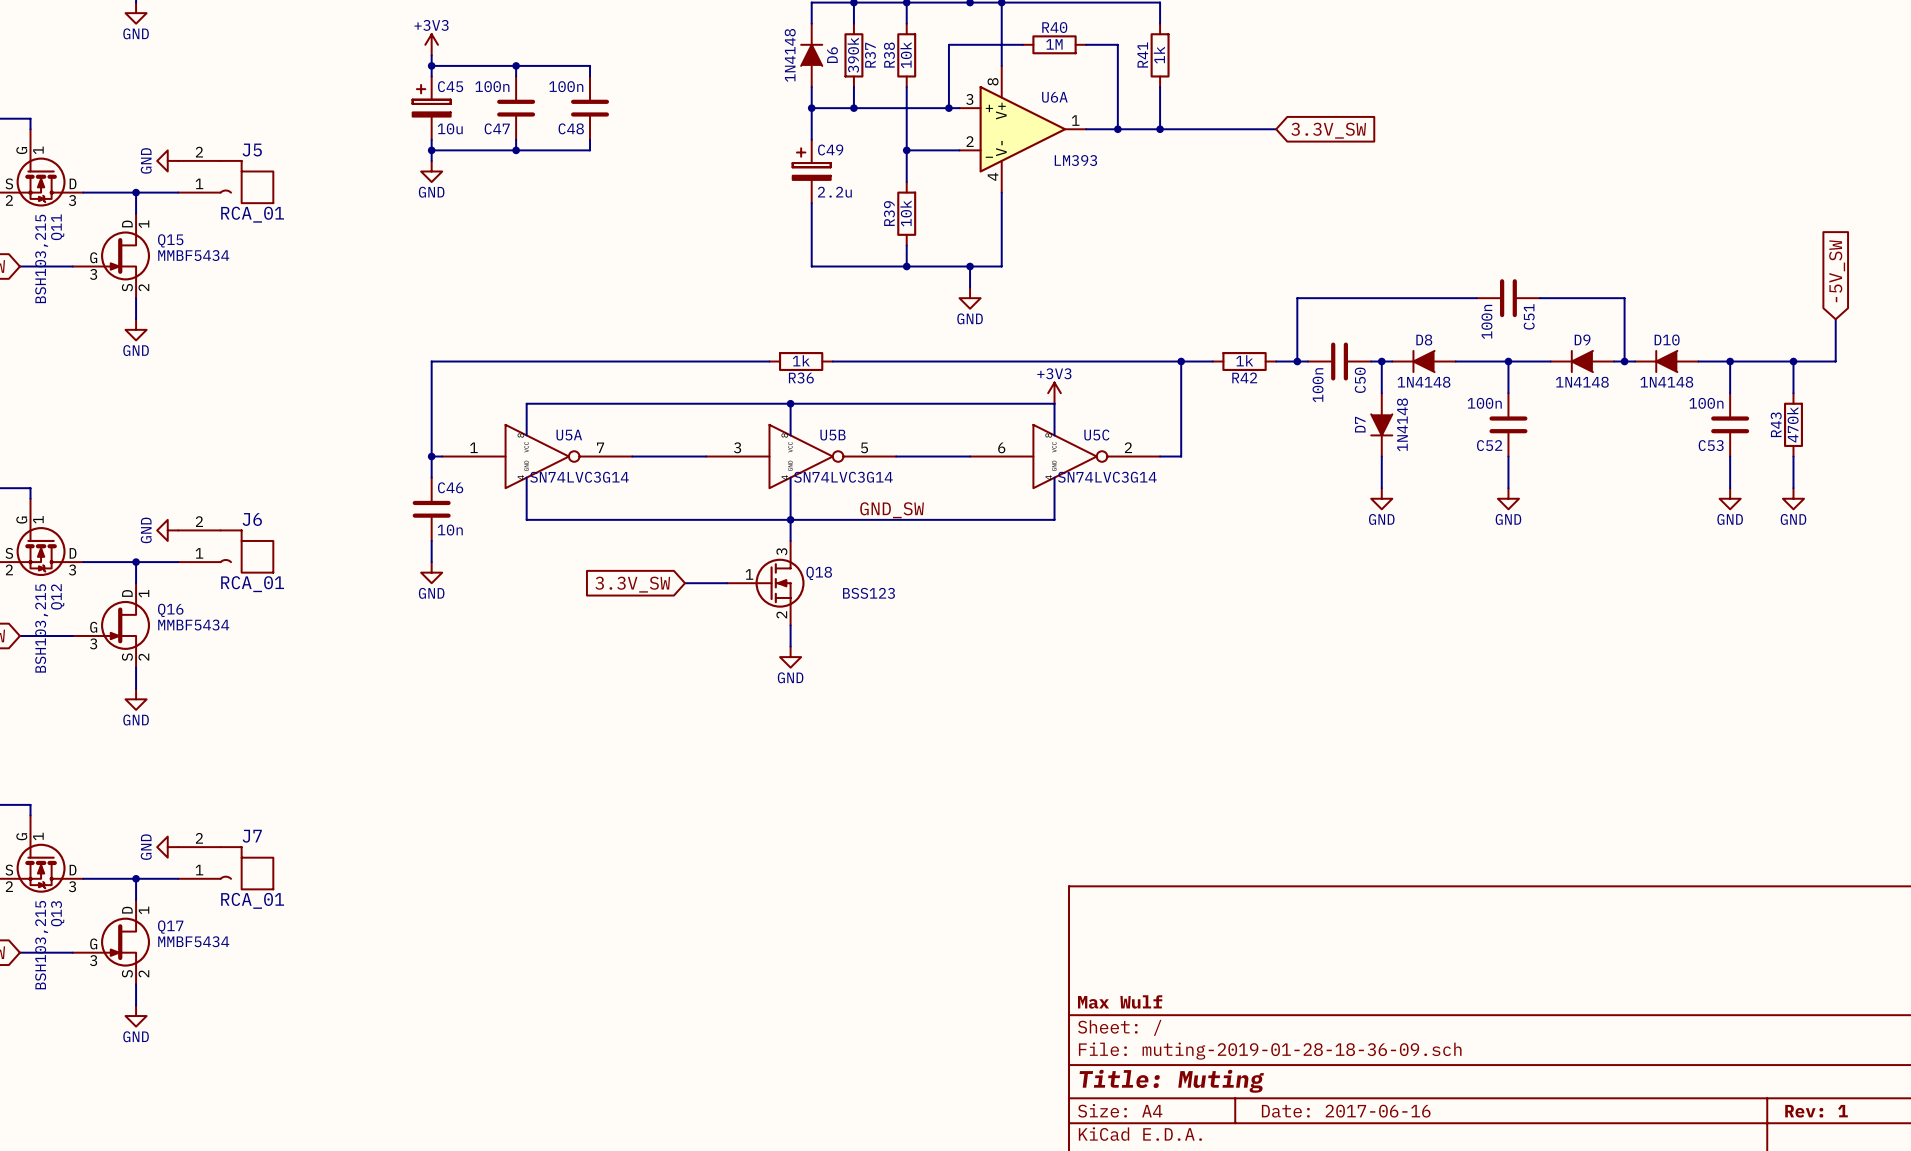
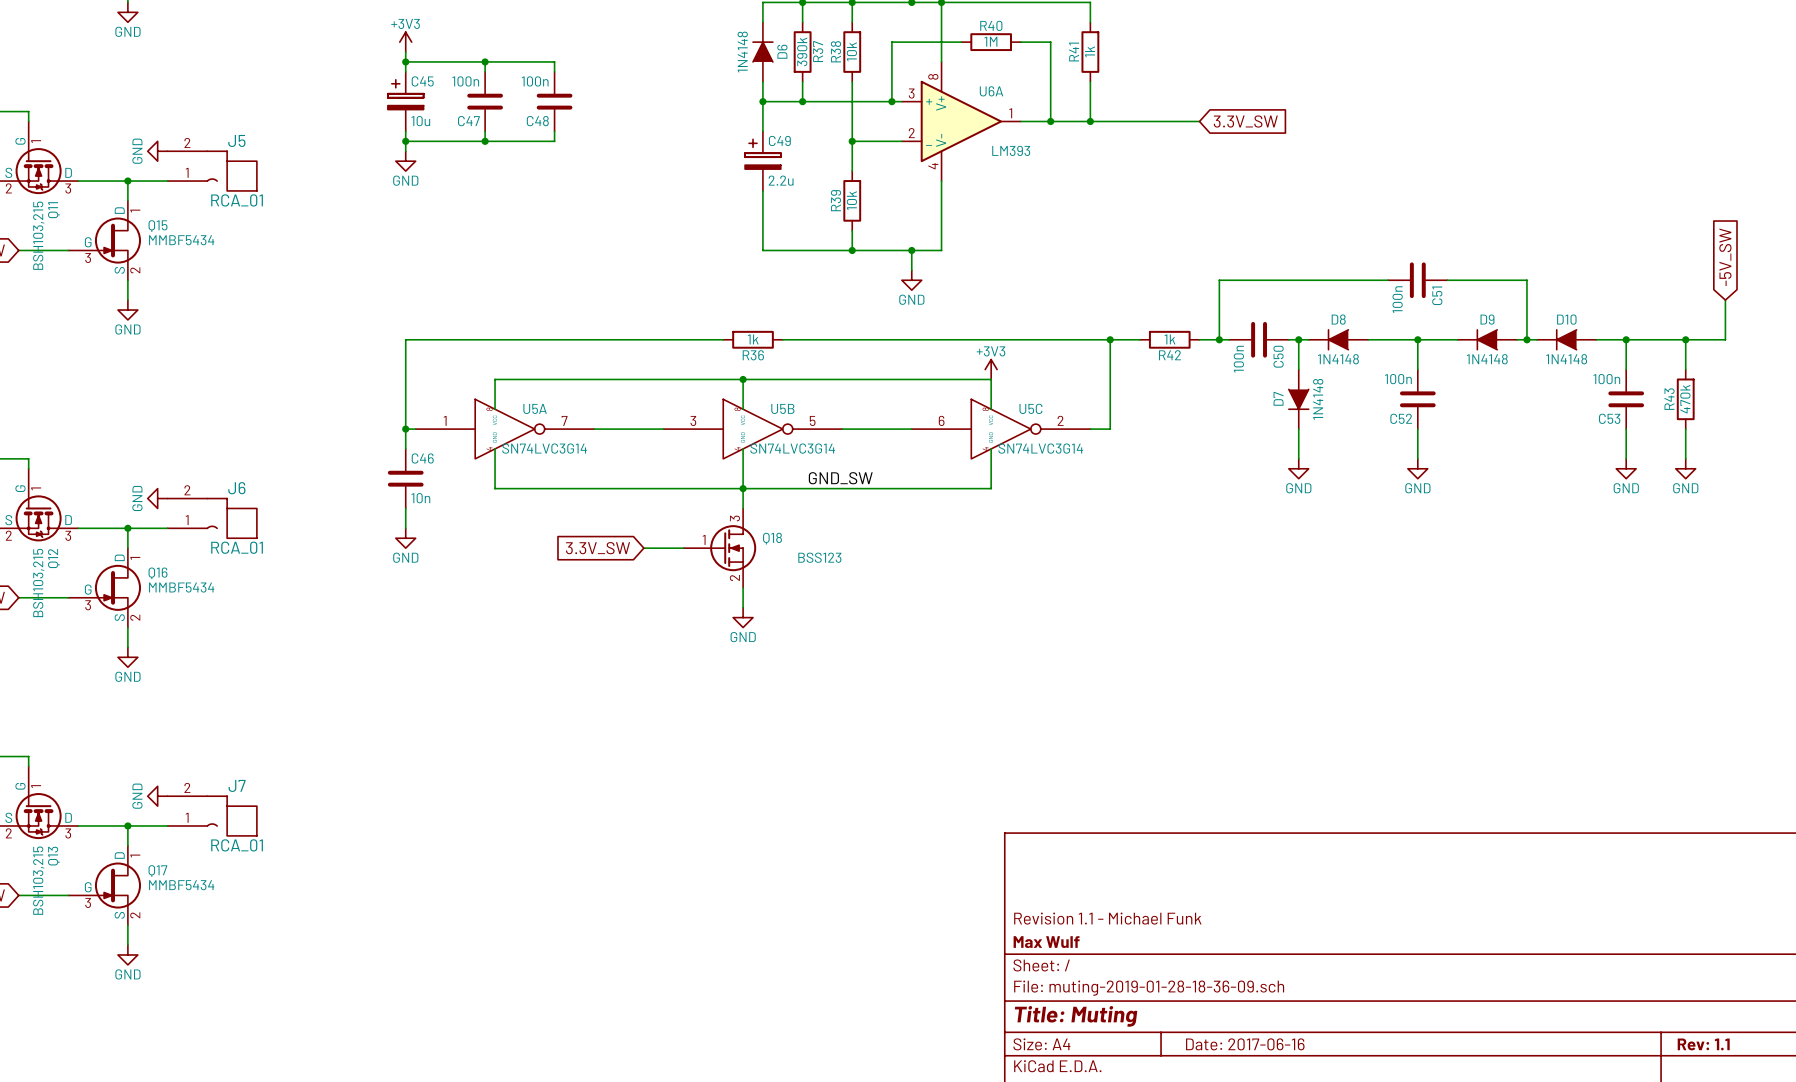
title block: none -> Revision 1.1 - Michael Funk (1107, 918)
title block: Rev: 1 (1816, 1111) -> Rev: 1.1 (1703, 1044)

